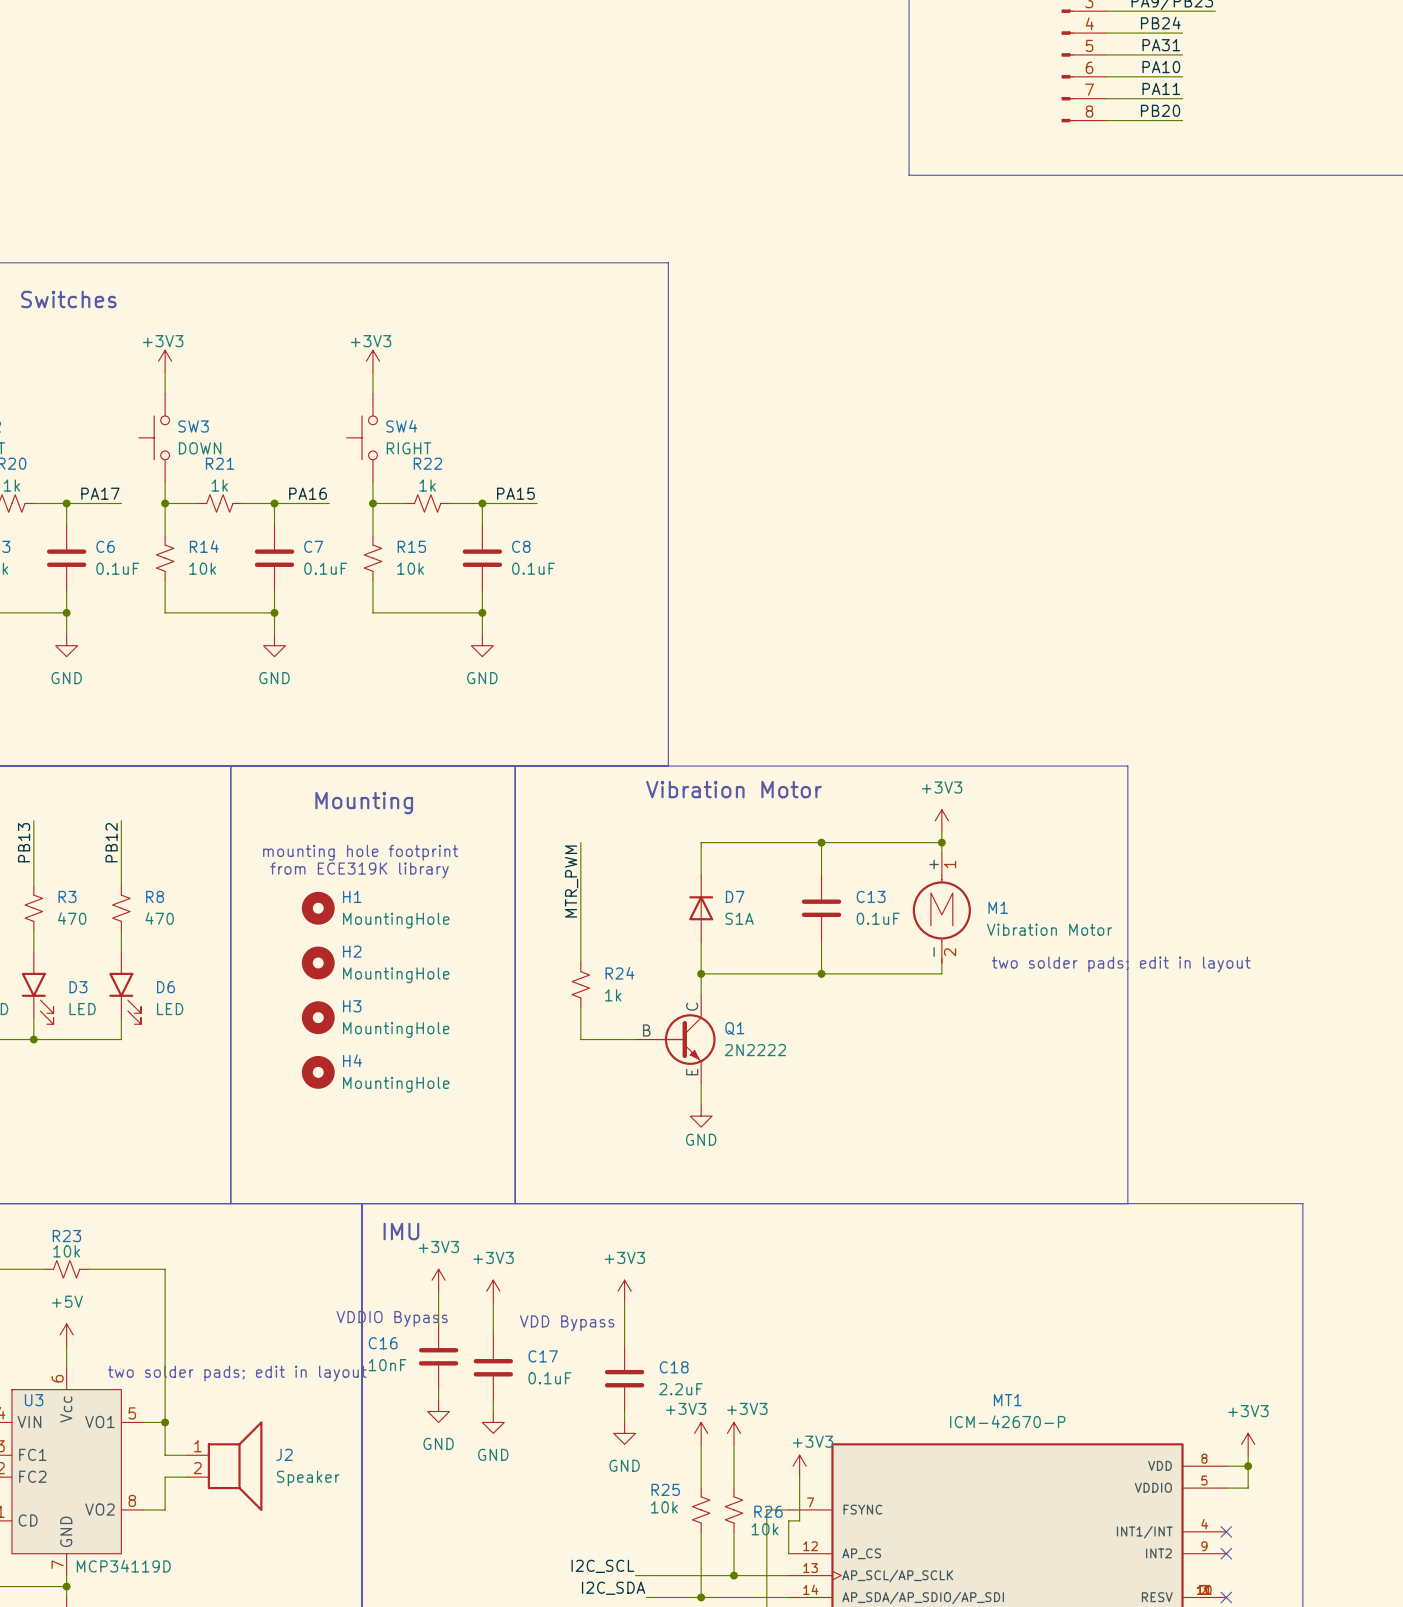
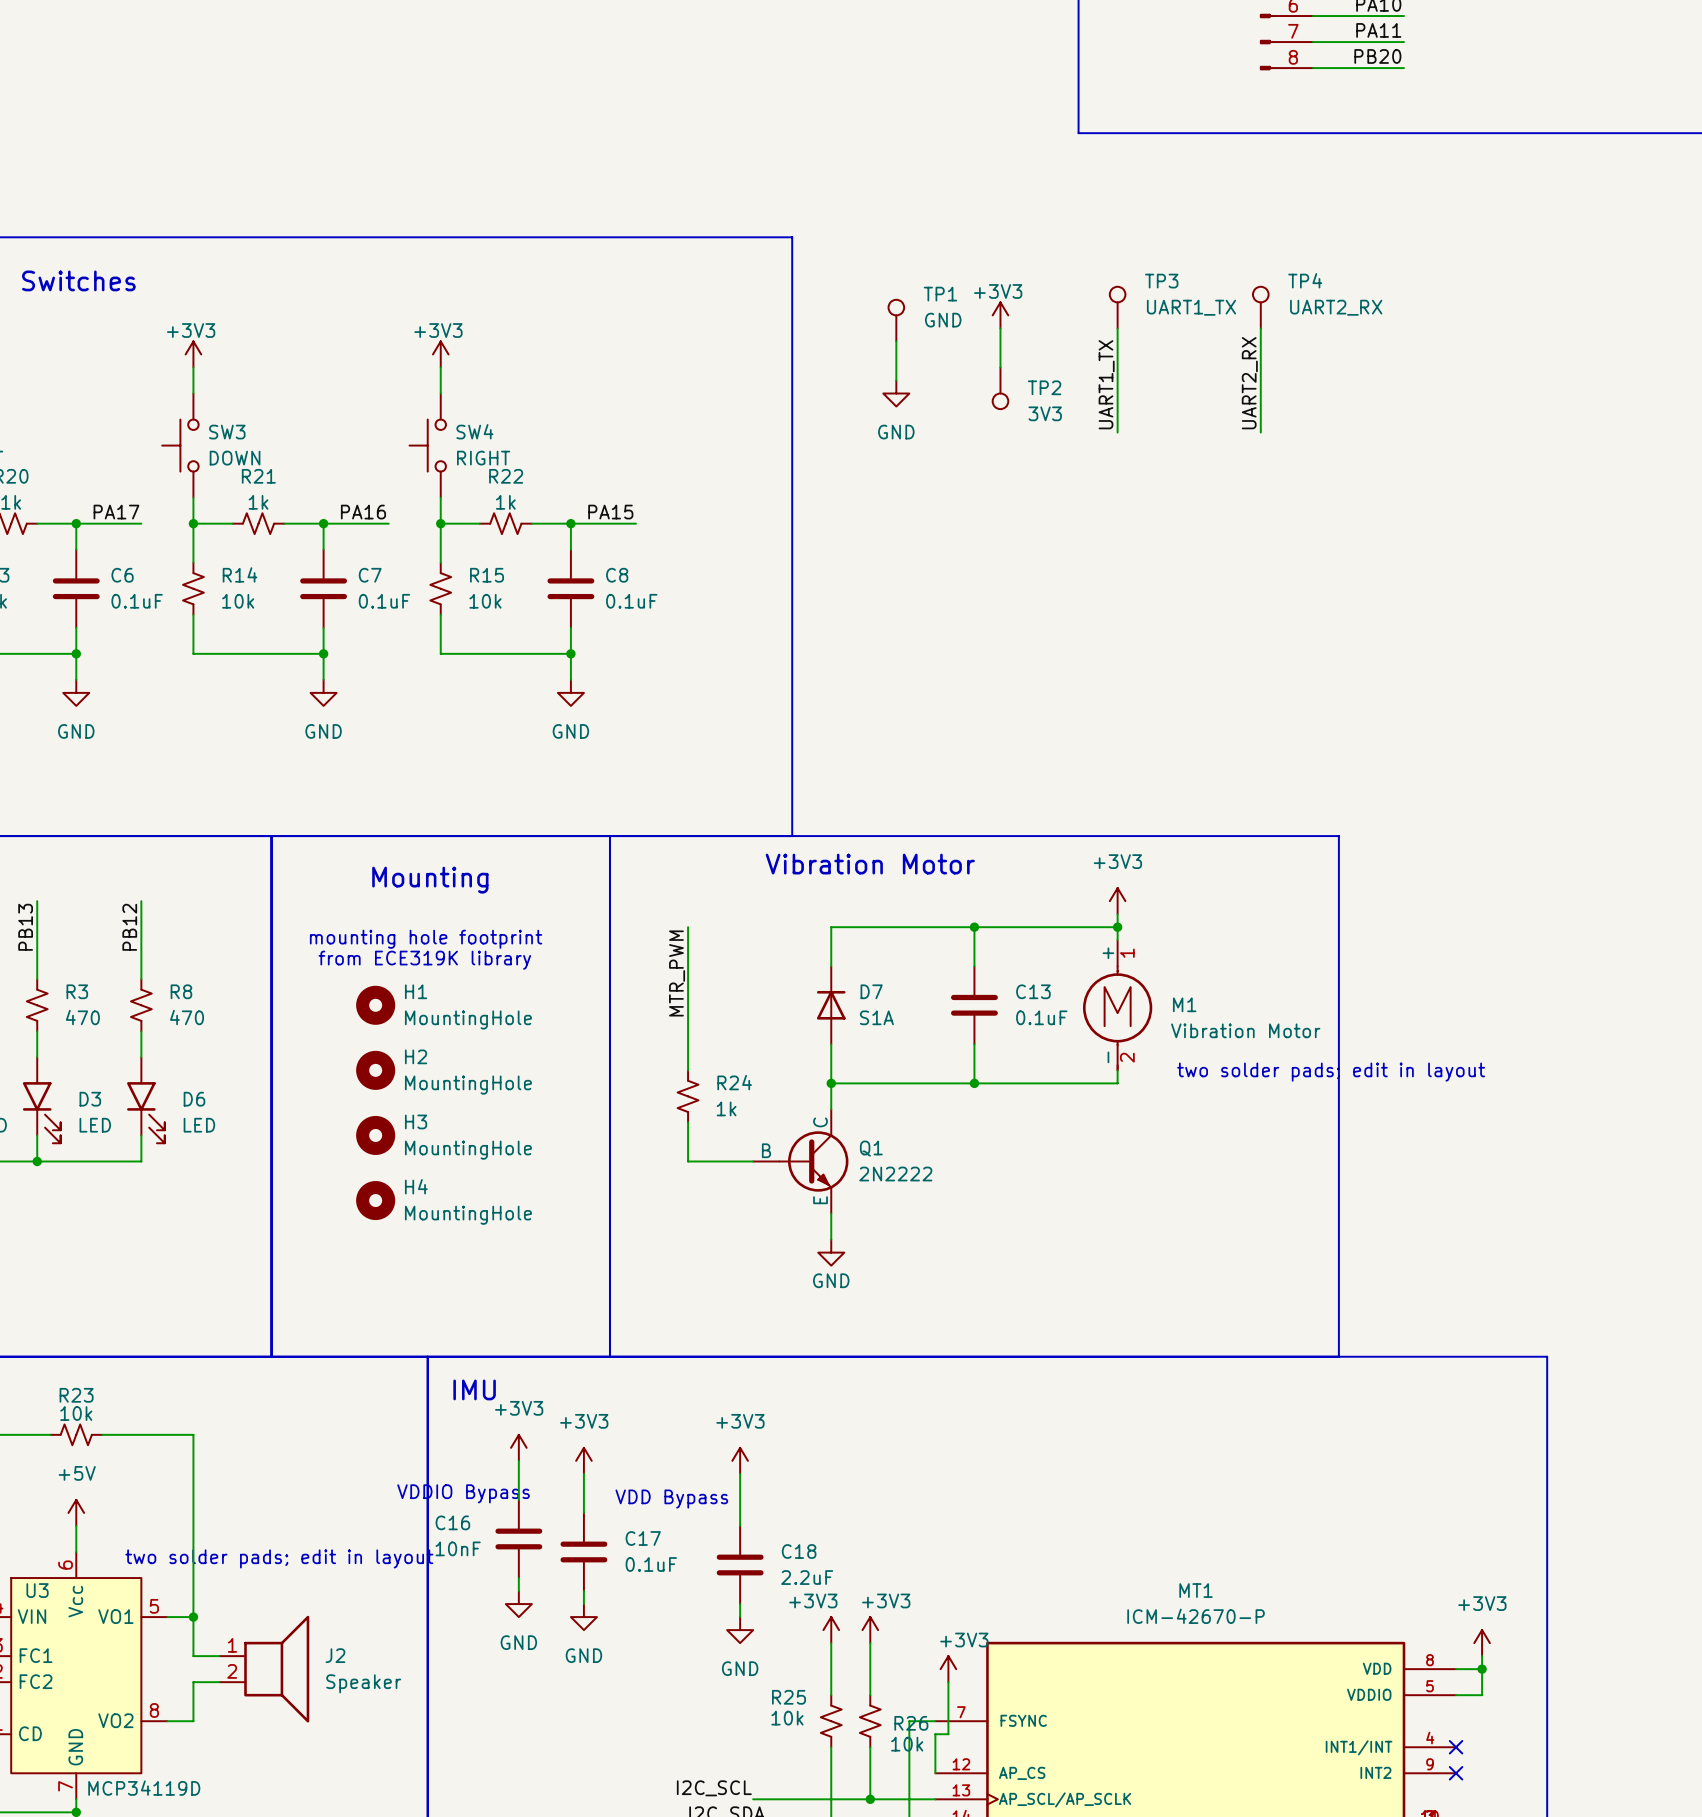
TP3: none -> UART1_TX (1117, 307)
TP4: none -> UART2_RX (1260, 307)
power symbol: none -> +3V3 (1000, 315)
TP1: none -> GND (896, 320)
wire: none -> (1000, 328) (1000, 367)
wire: none -> (1117, 328) (1117, 432)
wire: none -> (1260, 328) (1260, 432)
wire: none -> (896, 341) (896, 380)
label: none -> UART2_RX (1249, 383)
label: none -> UART1_TX (1106, 384)
TP2: none -> 3V3 (1000, 388)
power symbol: none -> GND (896, 393)

